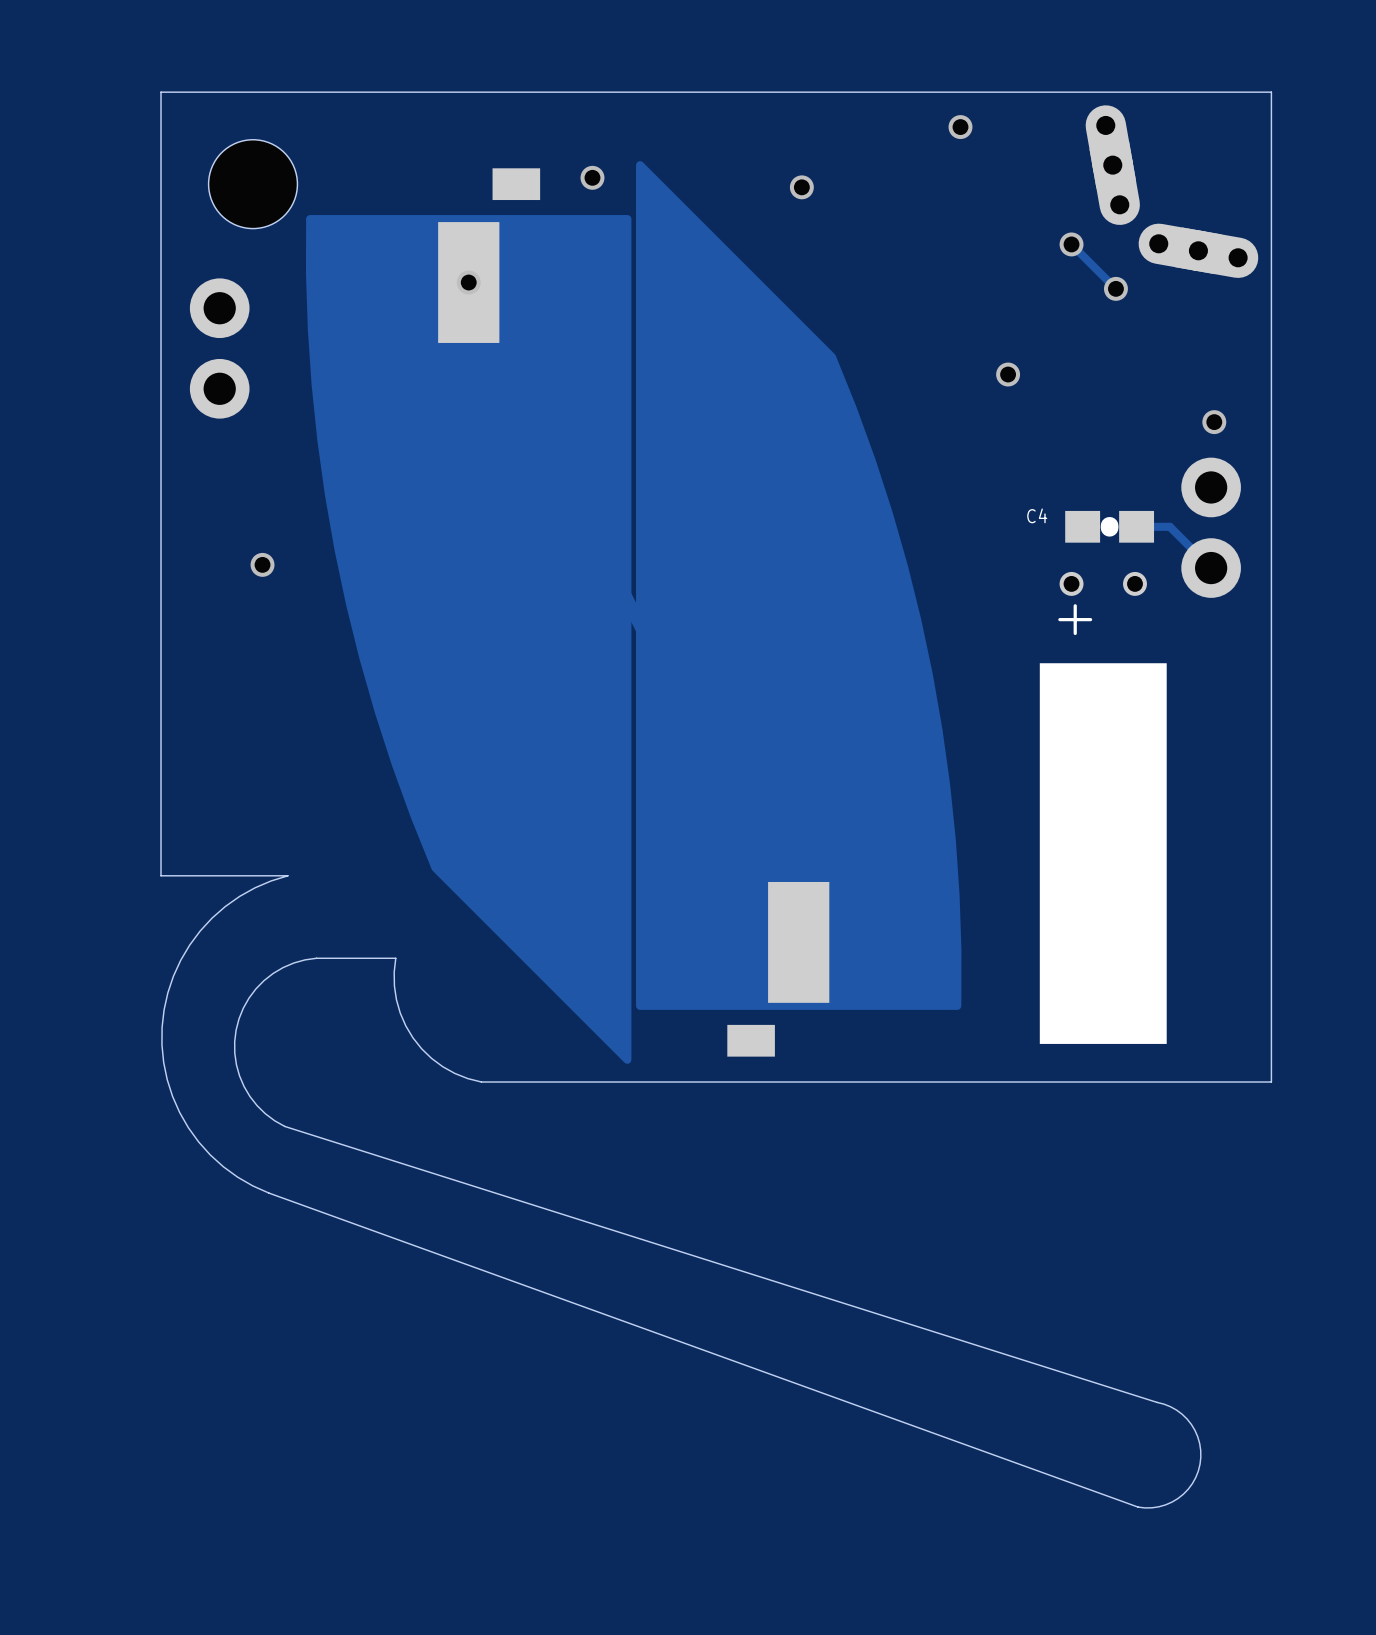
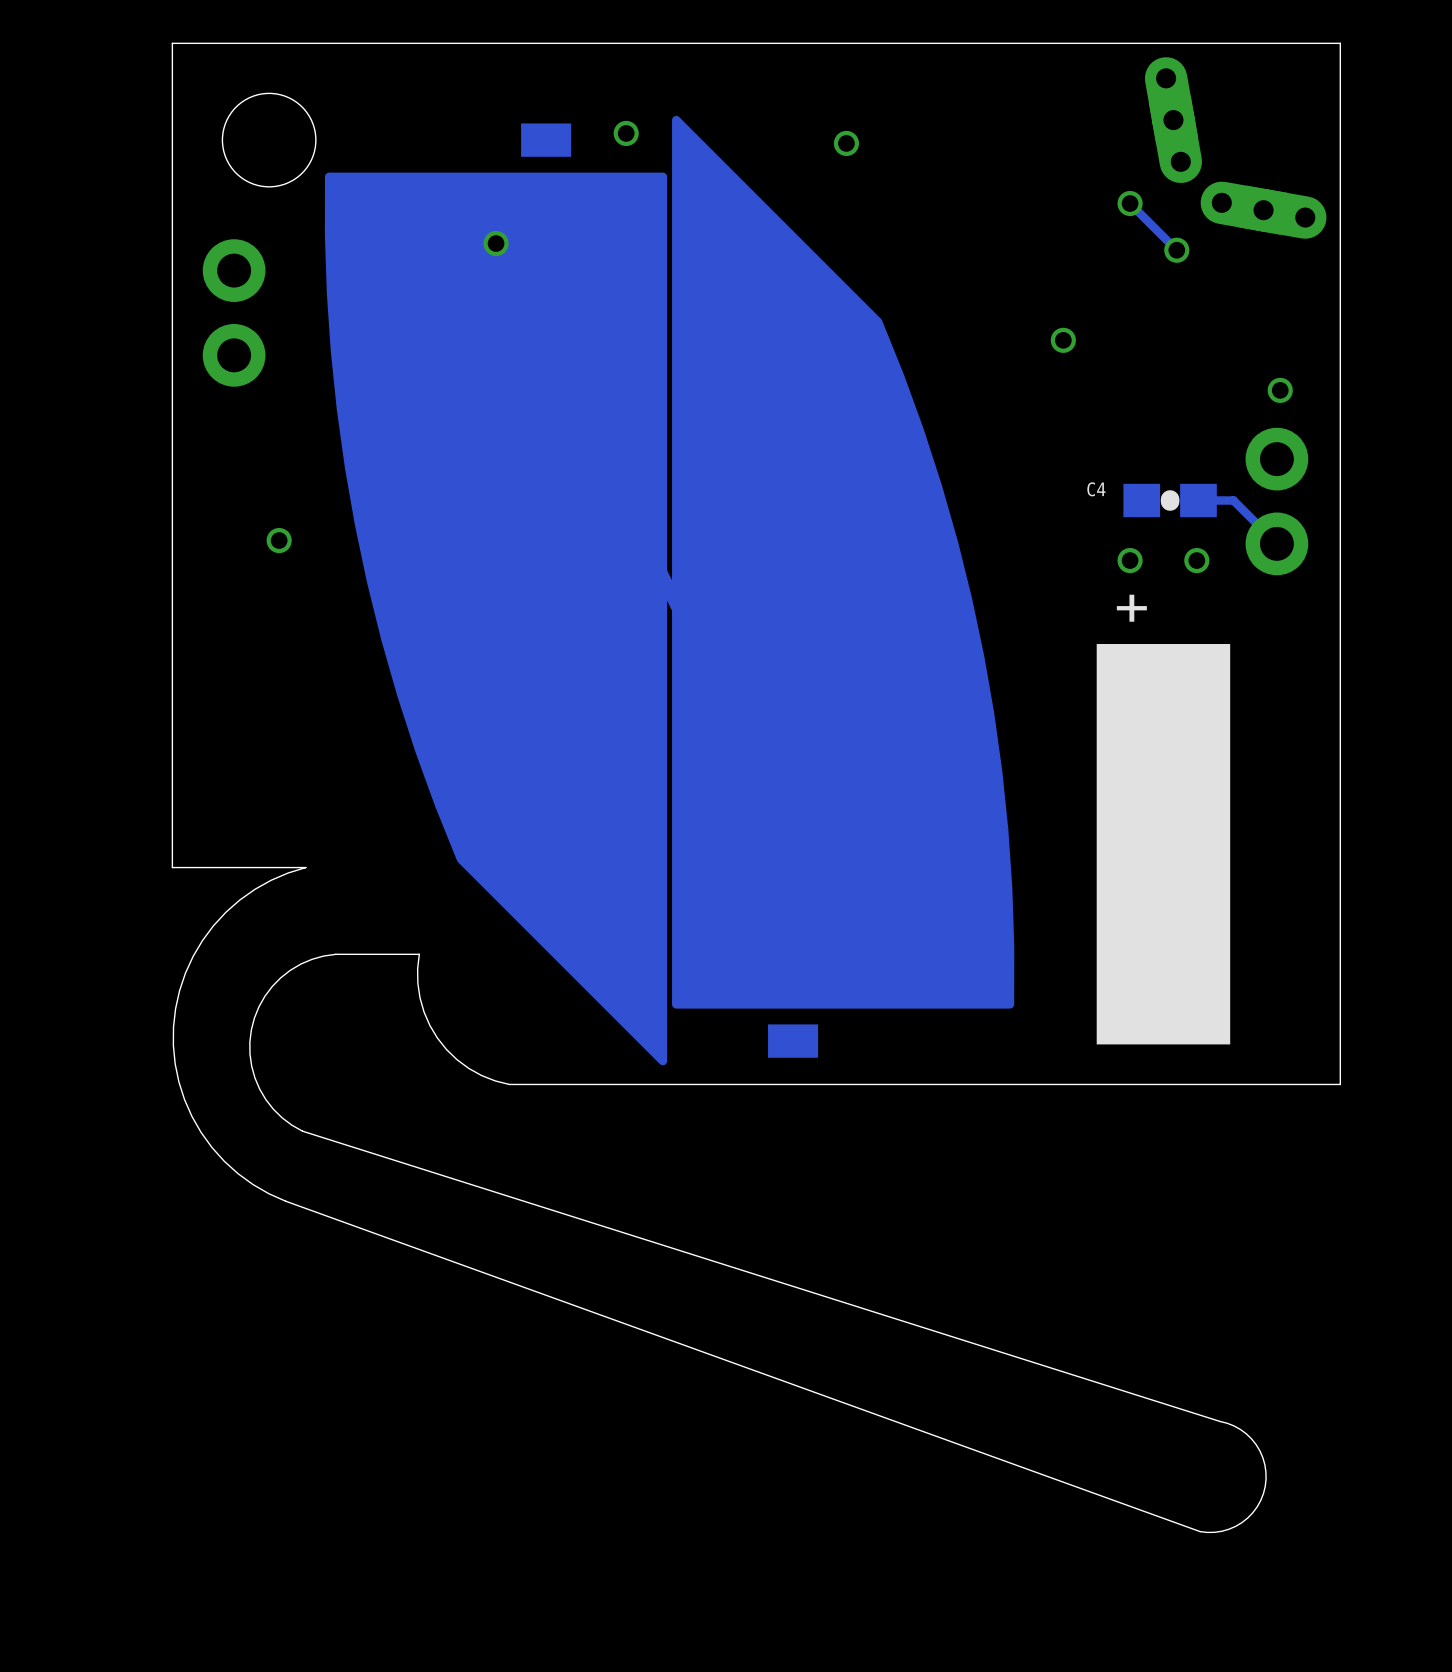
via: (960, 127) -> none

